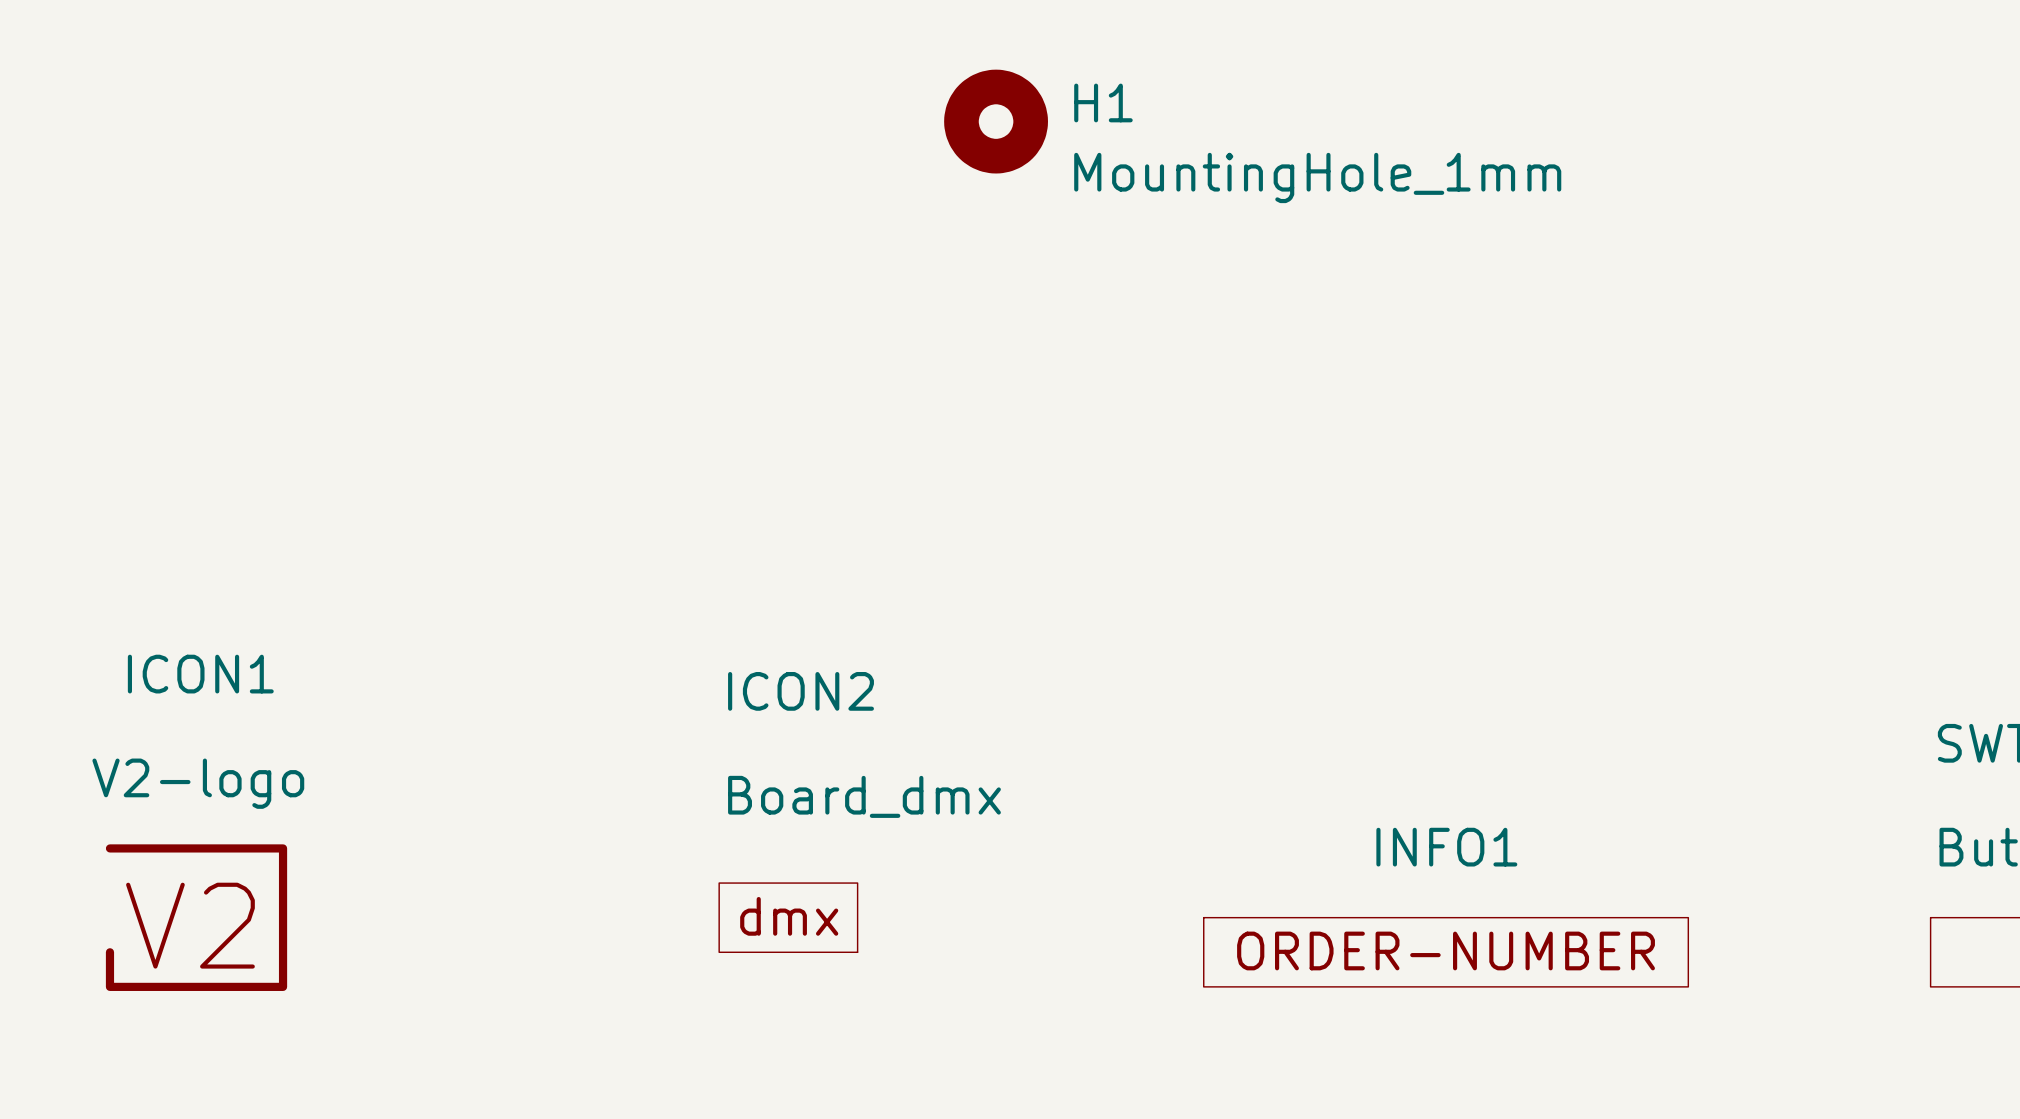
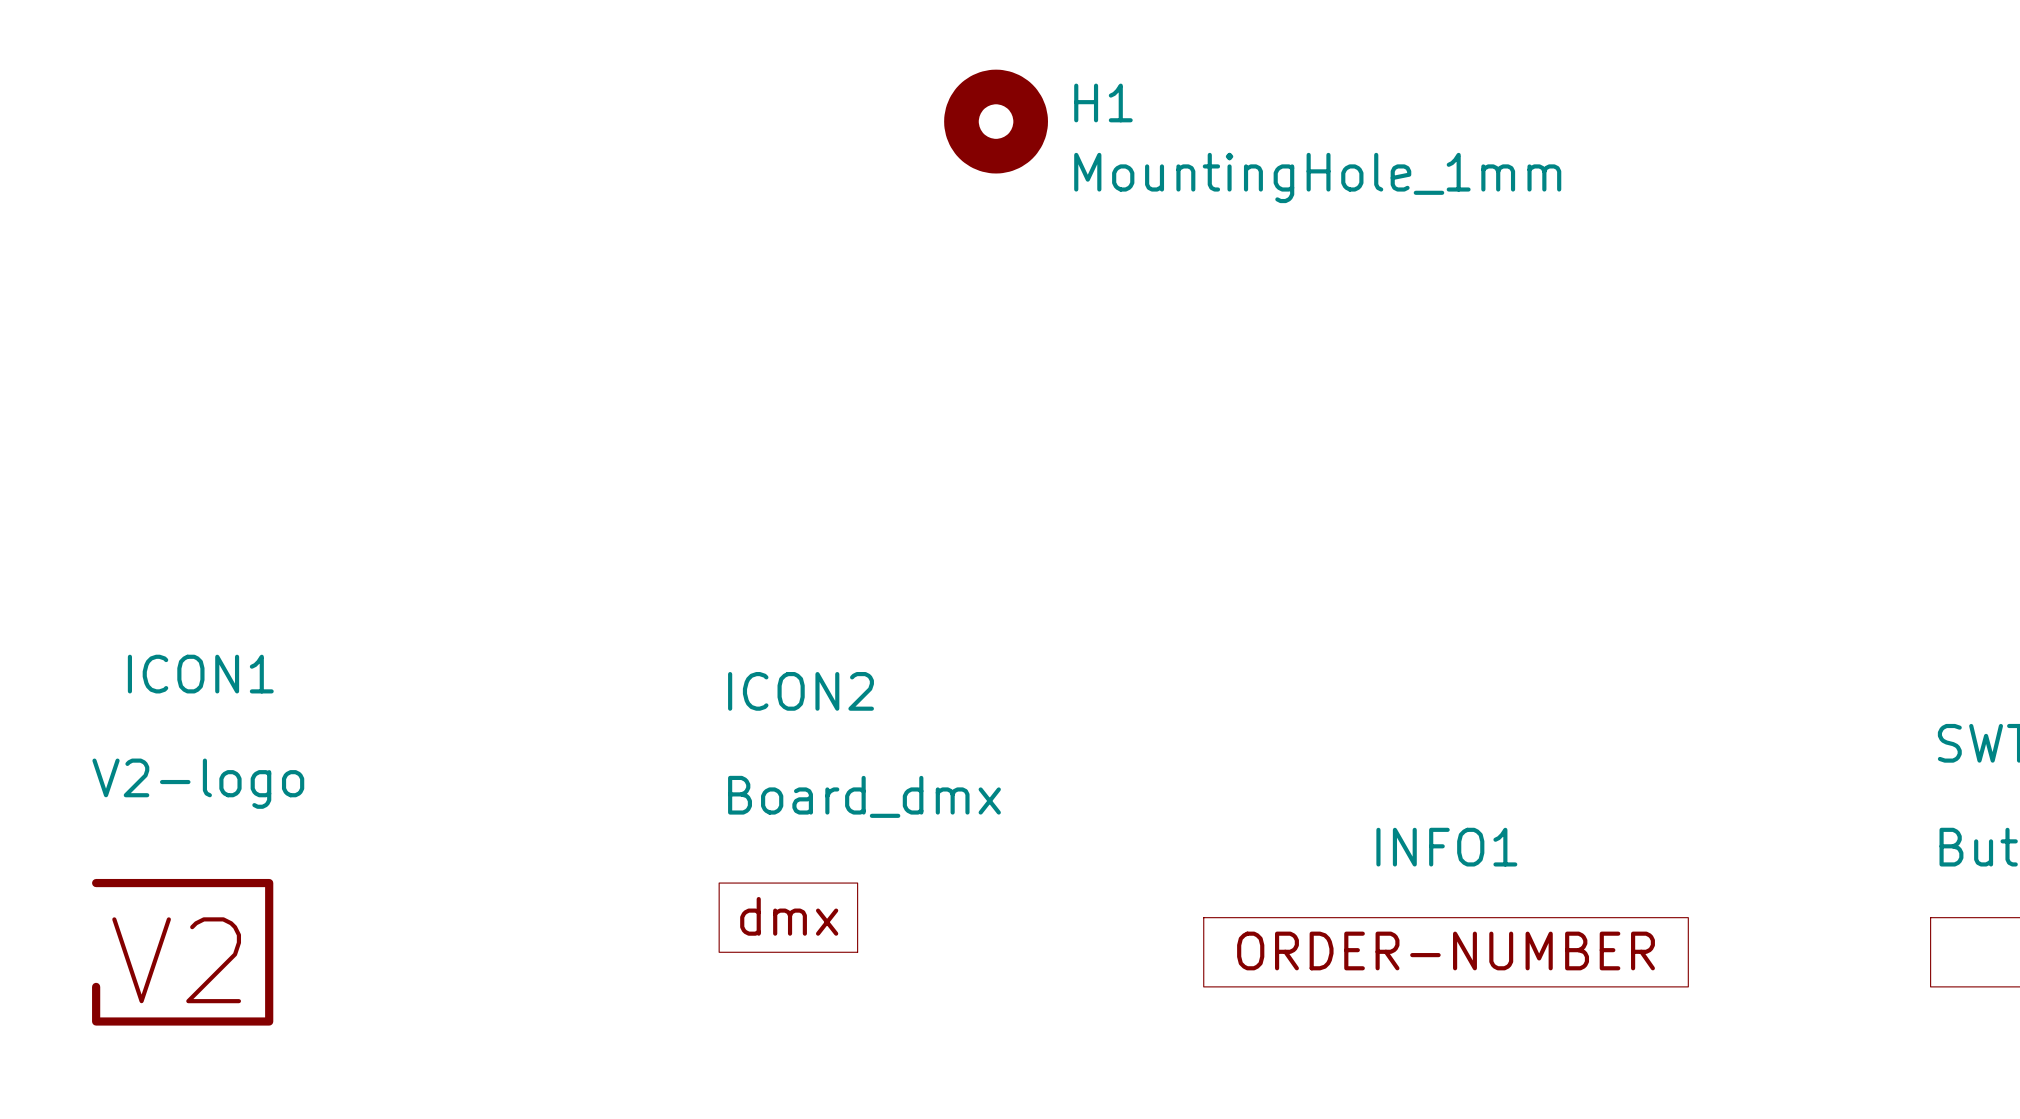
ICON1 position: (196, 917) -> (182, 952)

